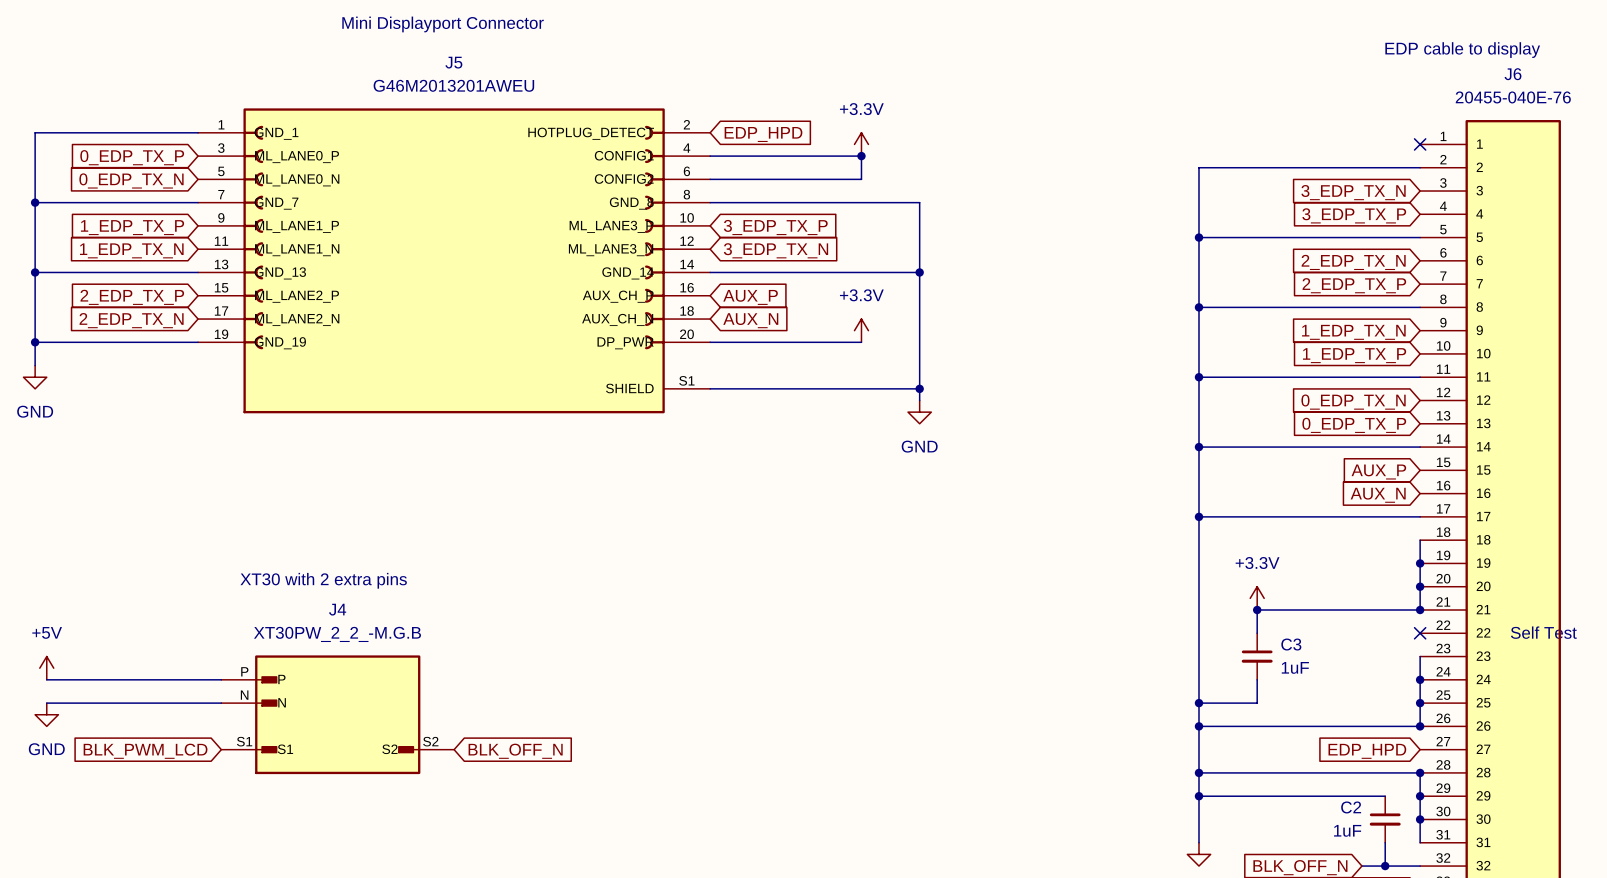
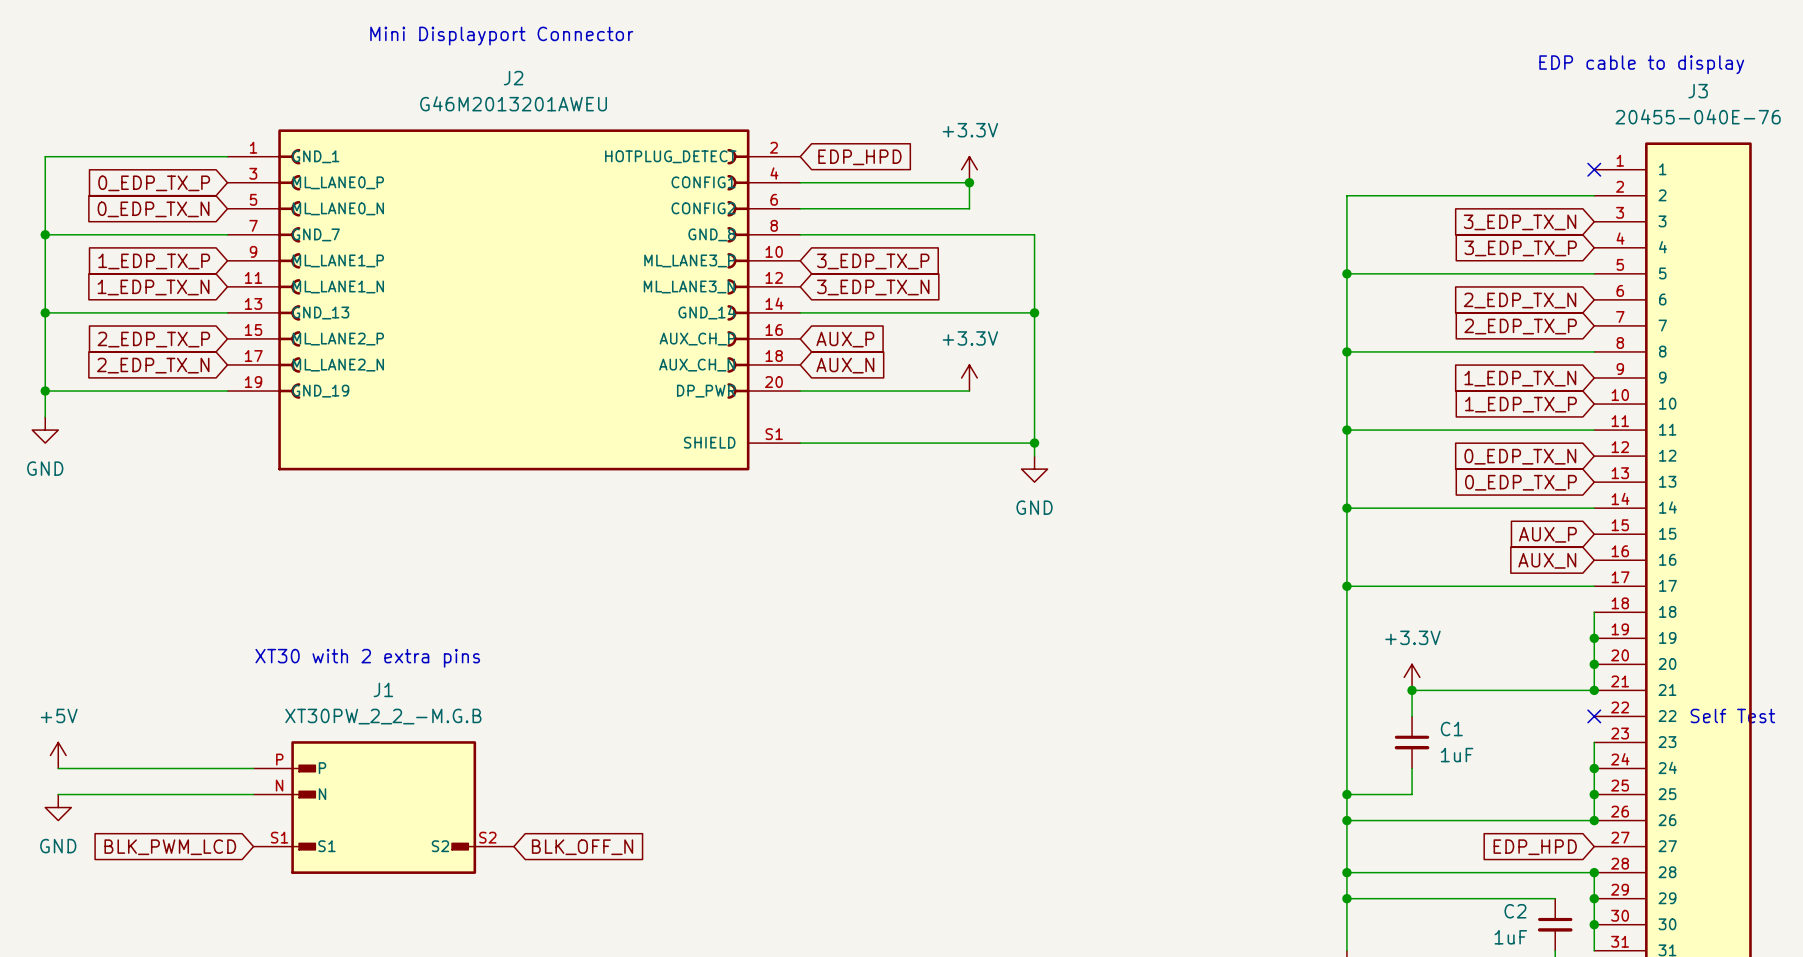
J5 name: J5 (453, 62) -> J2 (513, 78)
J6 name: J6 (1512, 74) -> J3 (1698, 91)
J4 name: J4 (337, 609) -> J1 (383, 689)
C3 name: C3 (1291, 644) -> C1 (1451, 729)

